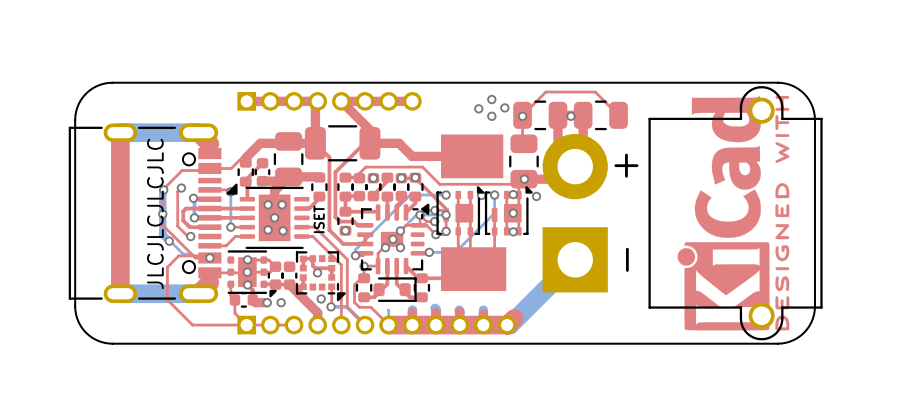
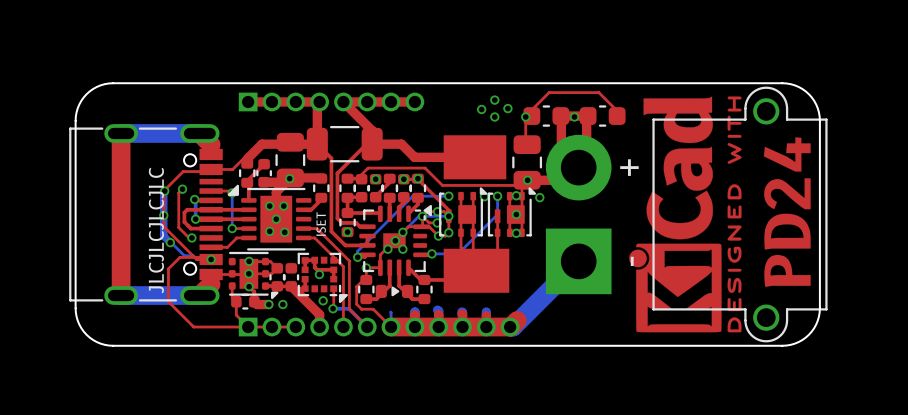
part footprint: [513, 100, 568, 131] -> [523, 105, 570, 127]
part footprint: [573, 100, 628, 131] -> [579, 105, 626, 127]
via: none -> (289, 178)
text: none -> PD24 (787, 212)
drawing position: (733, 213) -> (685, 214)
part footprint: [373, 277, 417, 302] -> [375, 284, 414, 298]

